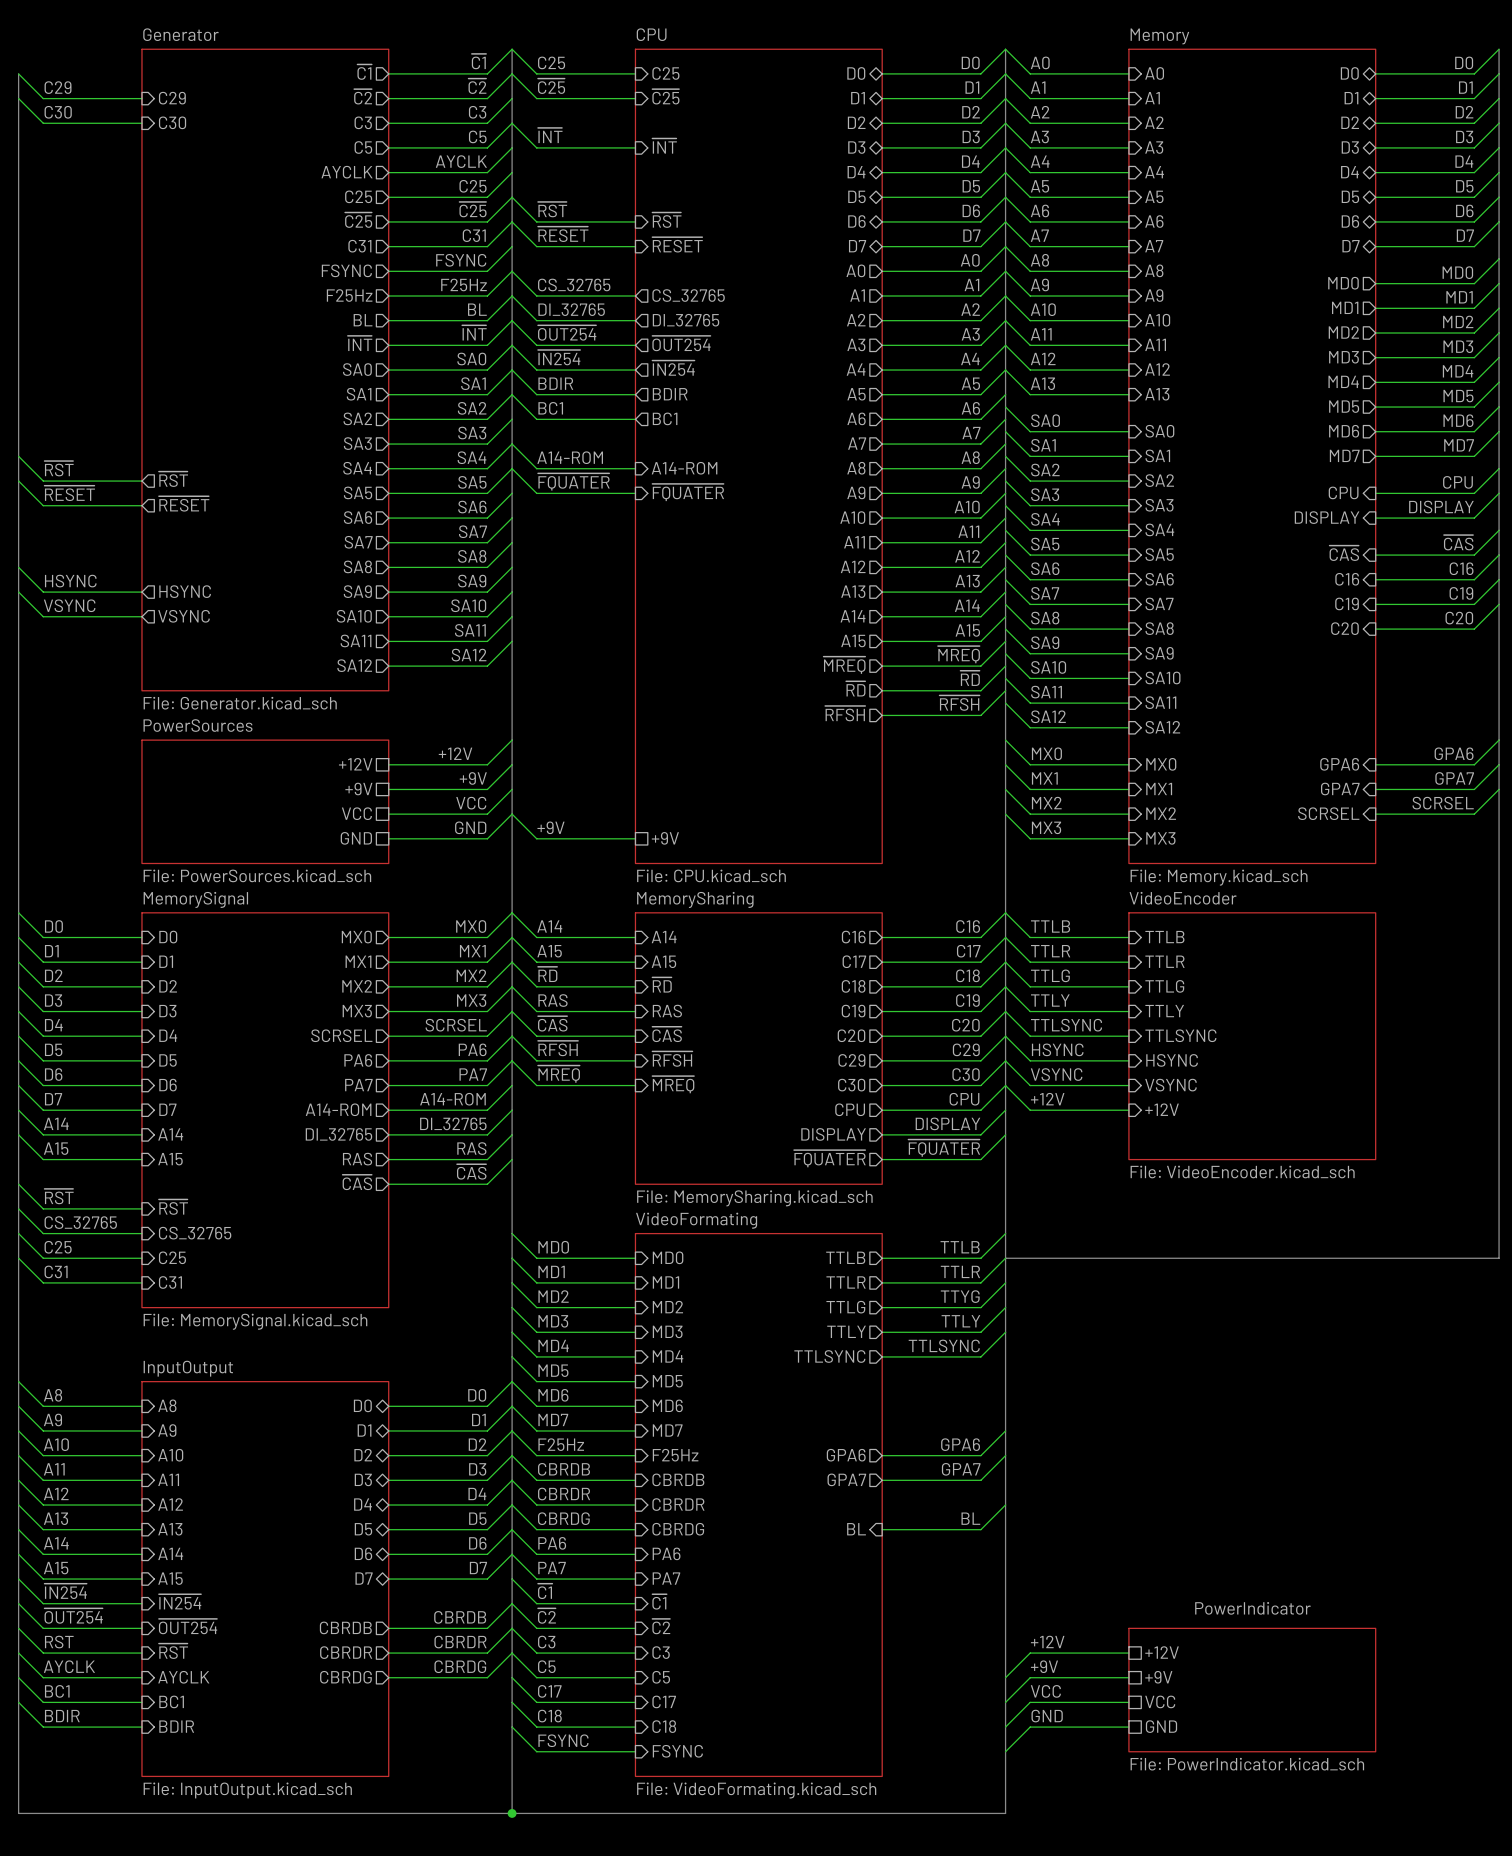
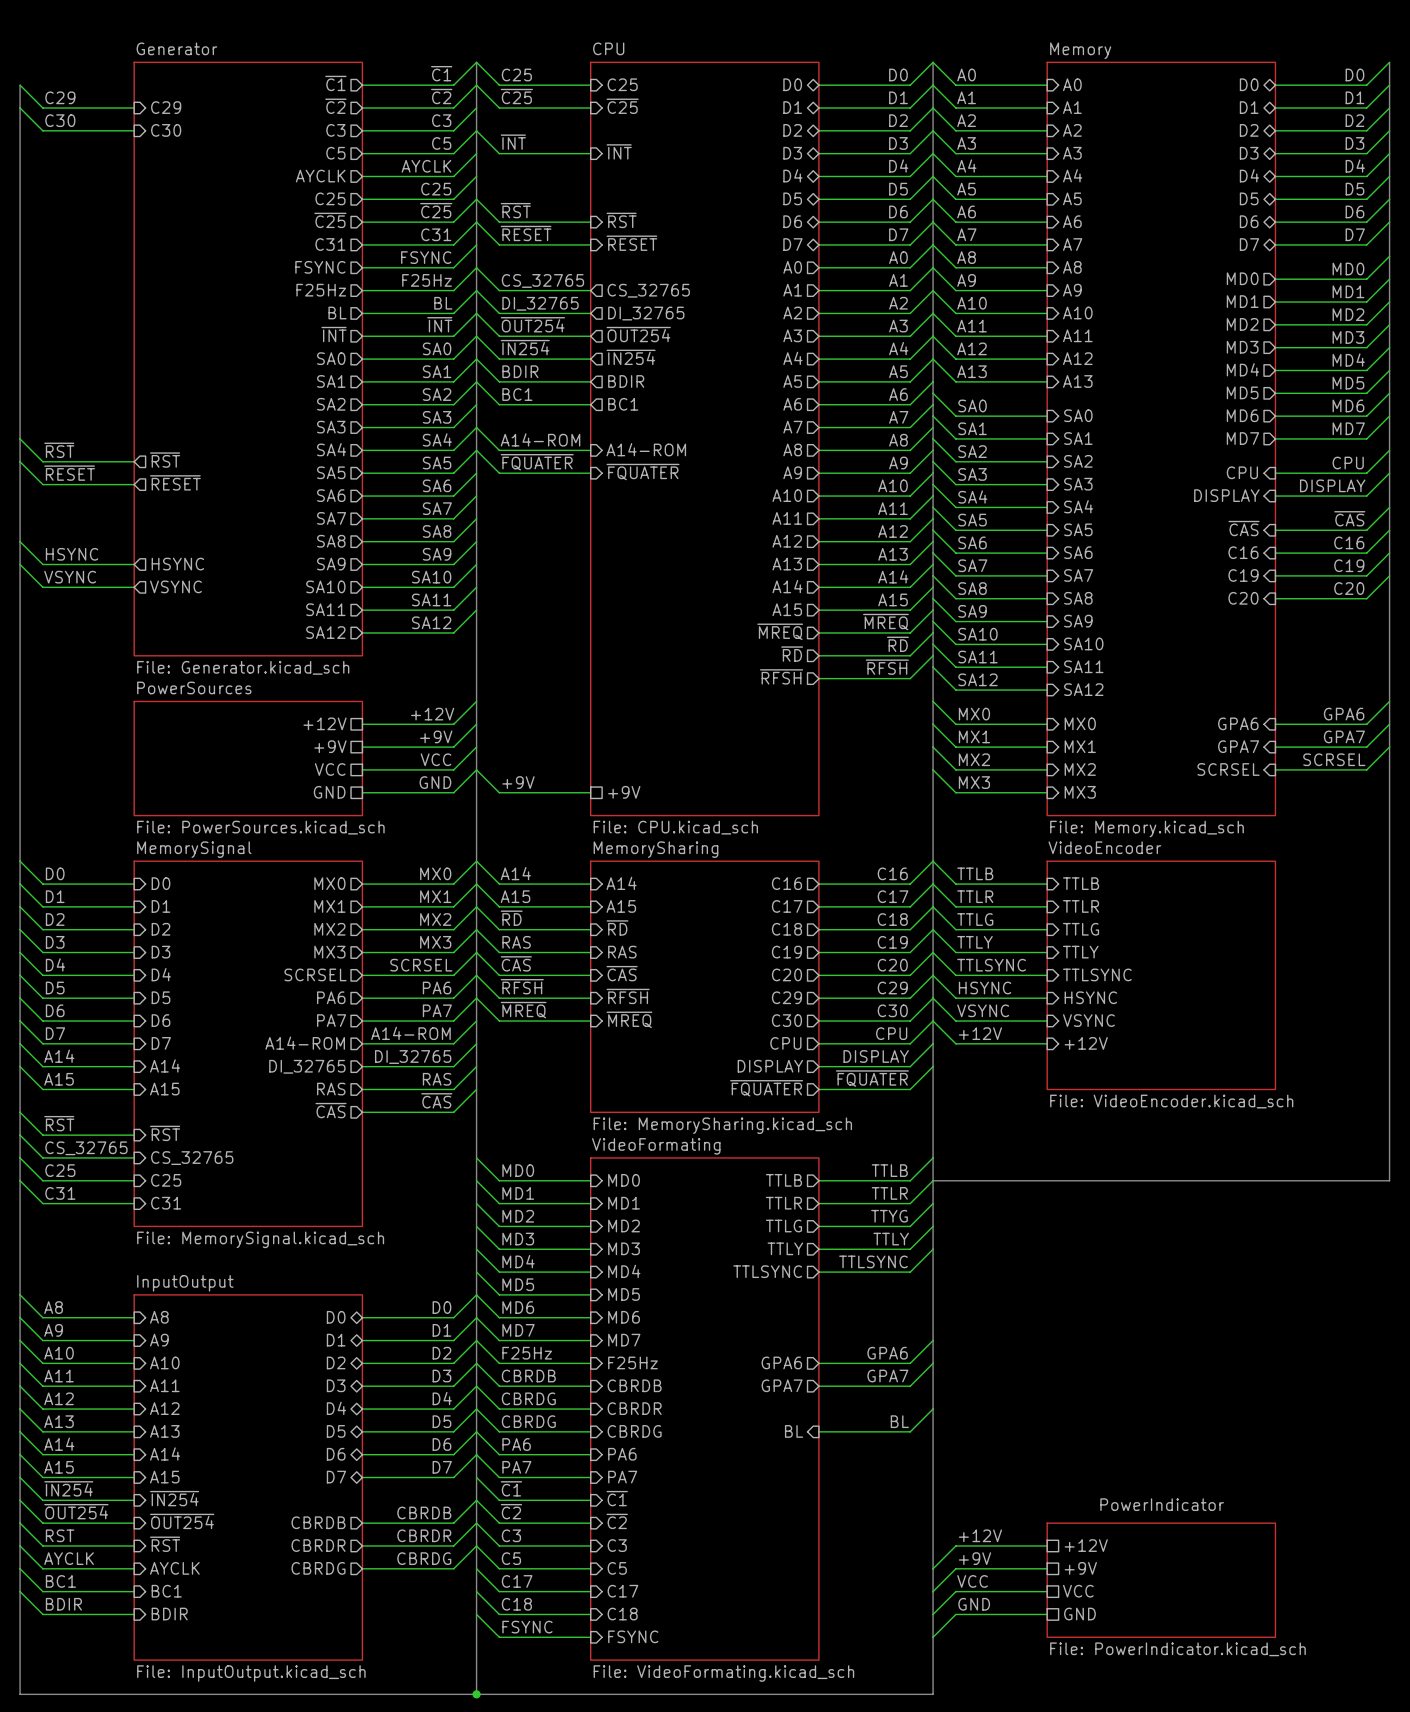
label: CBRDR (564, 1494) -> CBRDG (528, 1398)

